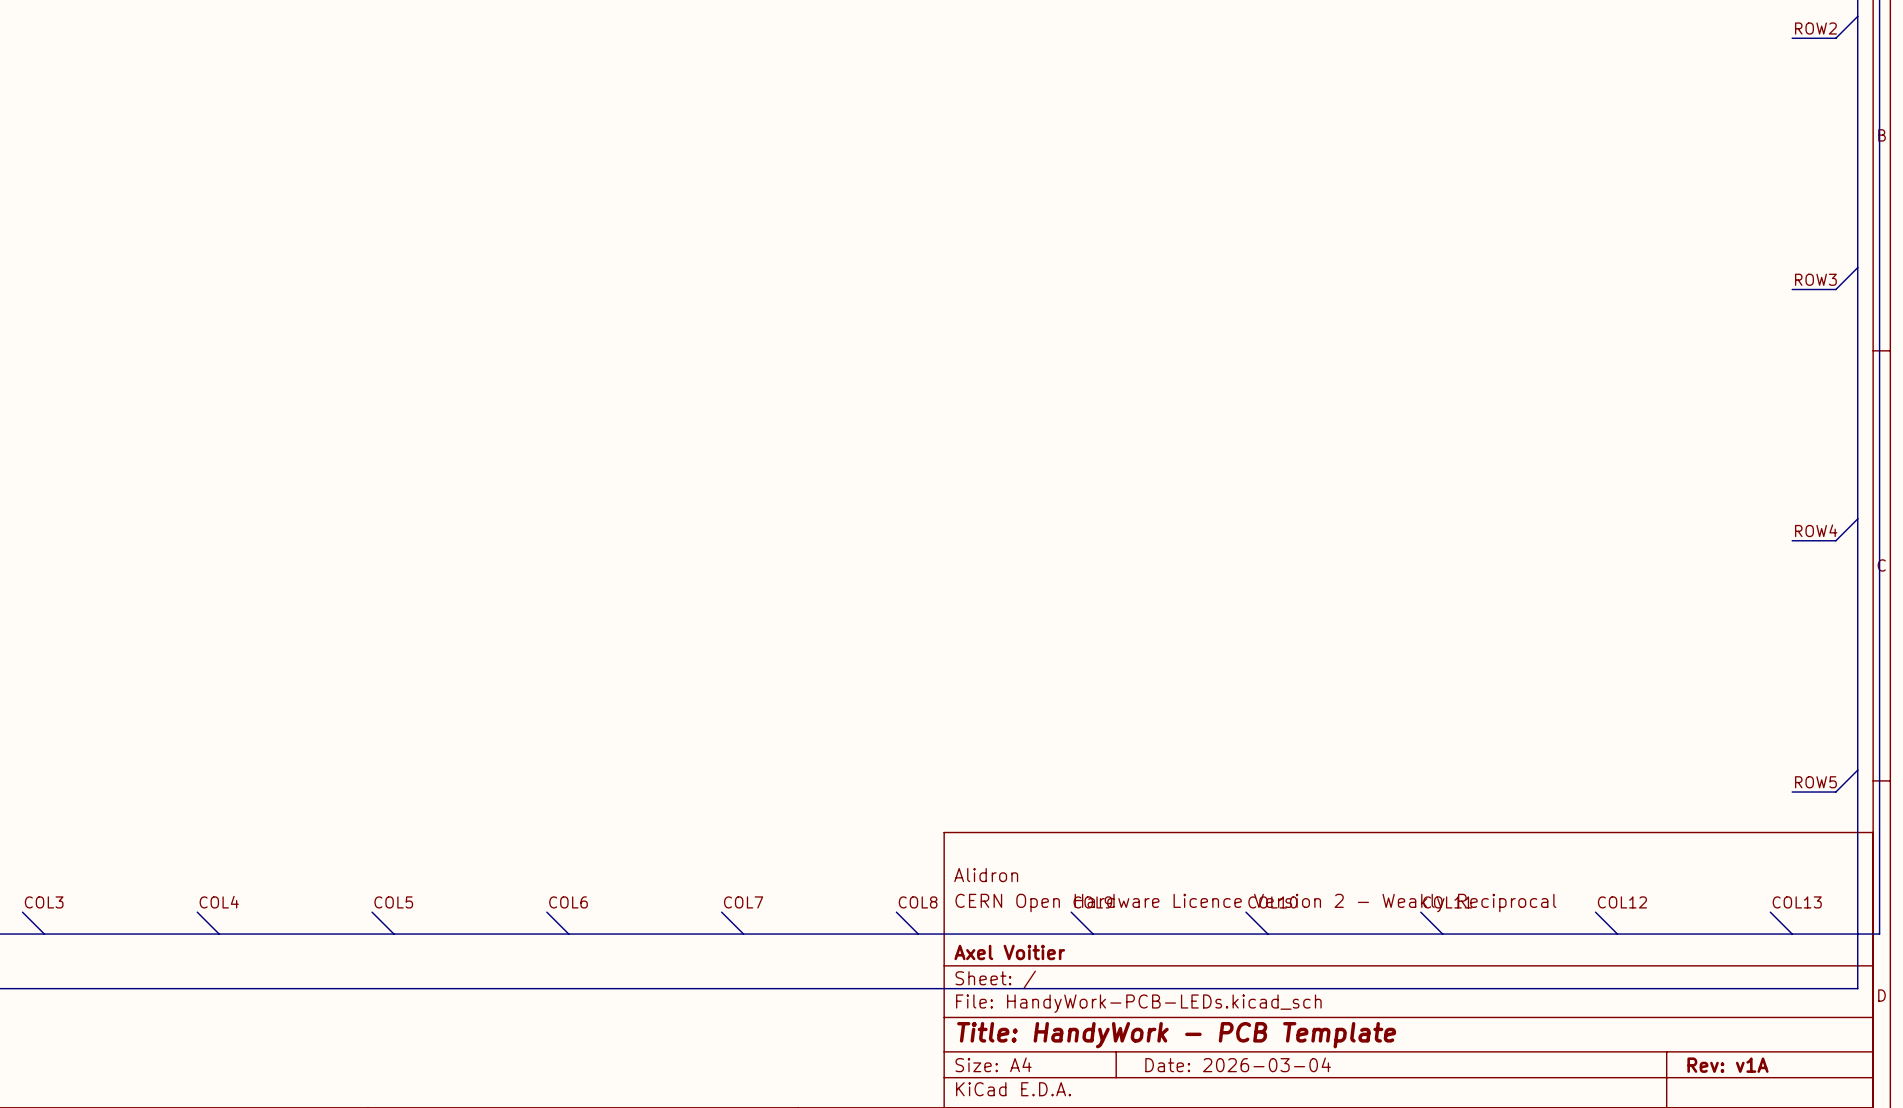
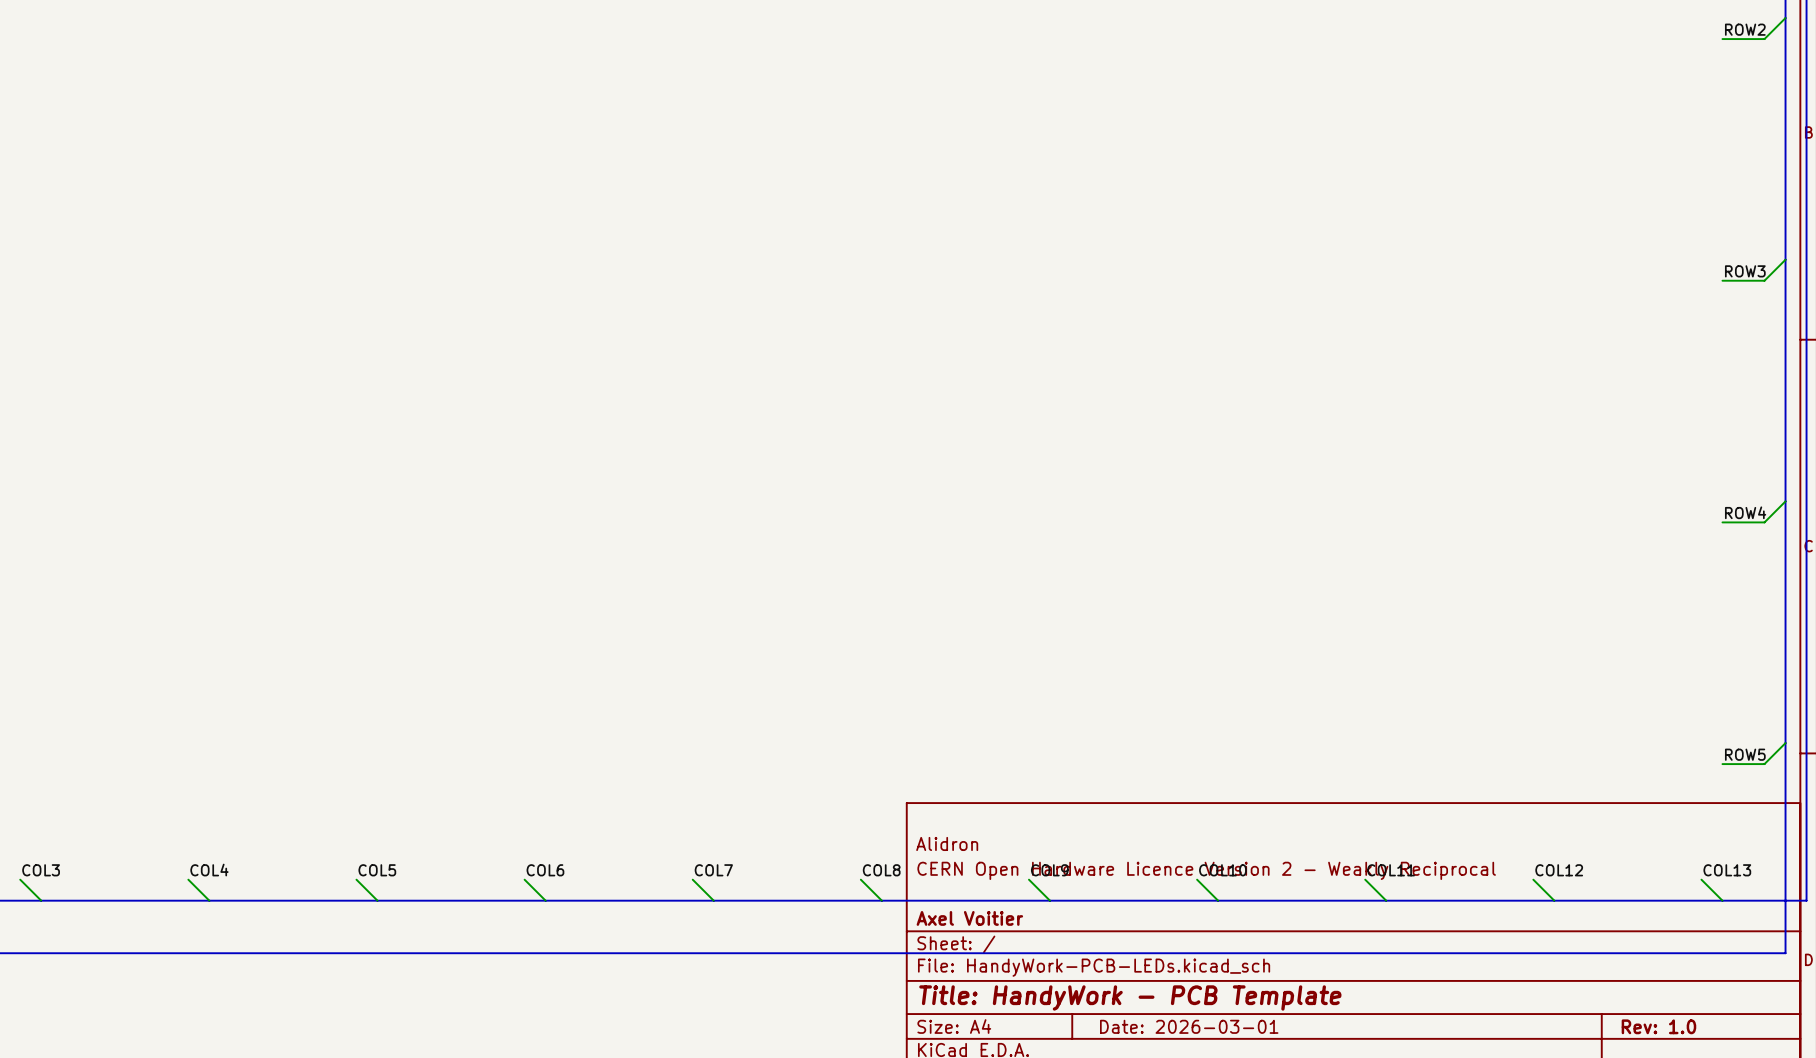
title block: Date: 2026-03-04 (1238, 1064) -> Date: 2026-03-01 (1189, 1026)
title block: Rev: v1A (1727, 1065) -> Rev: 1.0 (1658, 1026)

